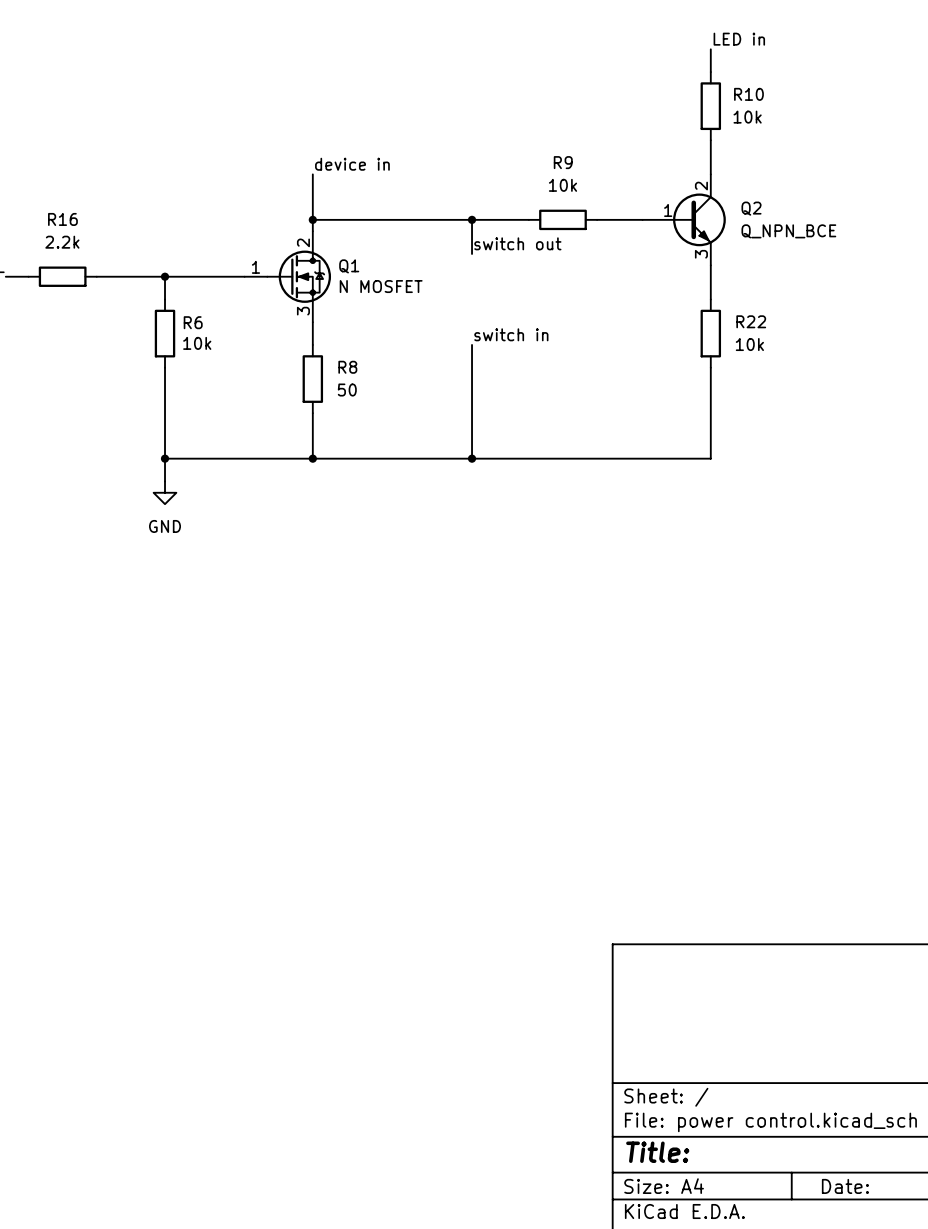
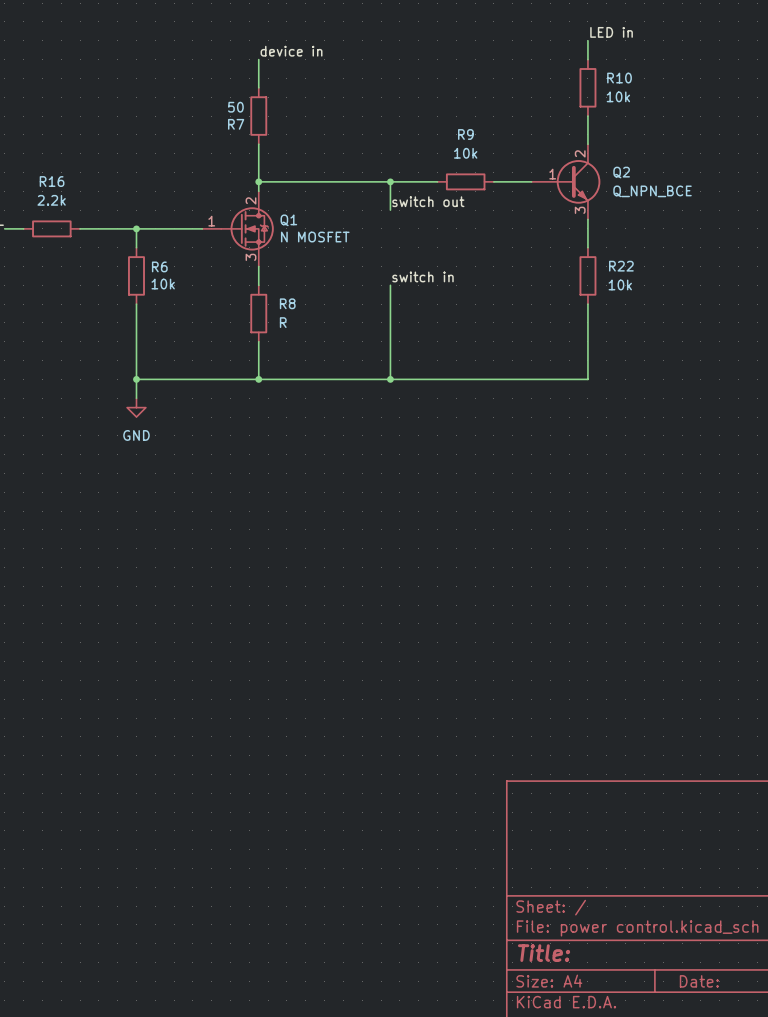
wire: none -> (258, 59) (258, 87)
R7: none -> 50 (258, 116)
label position: device in (352, 164) -> device in (291, 51)
R8 value: 50 (347, 390) -> R (283, 322)

